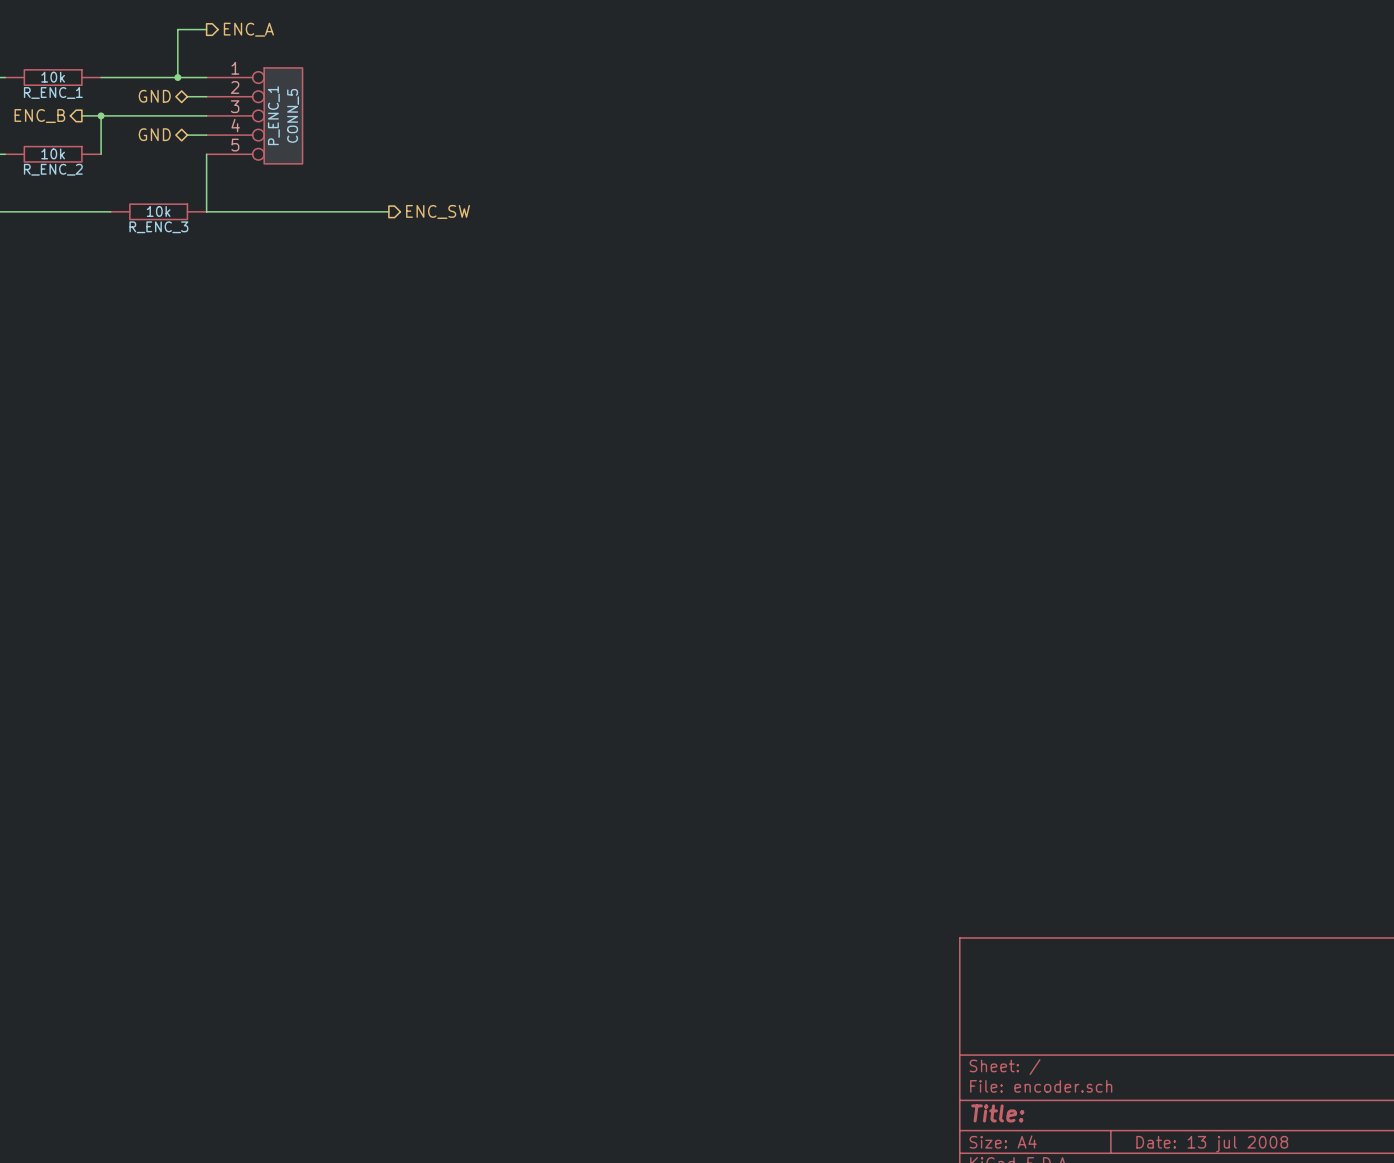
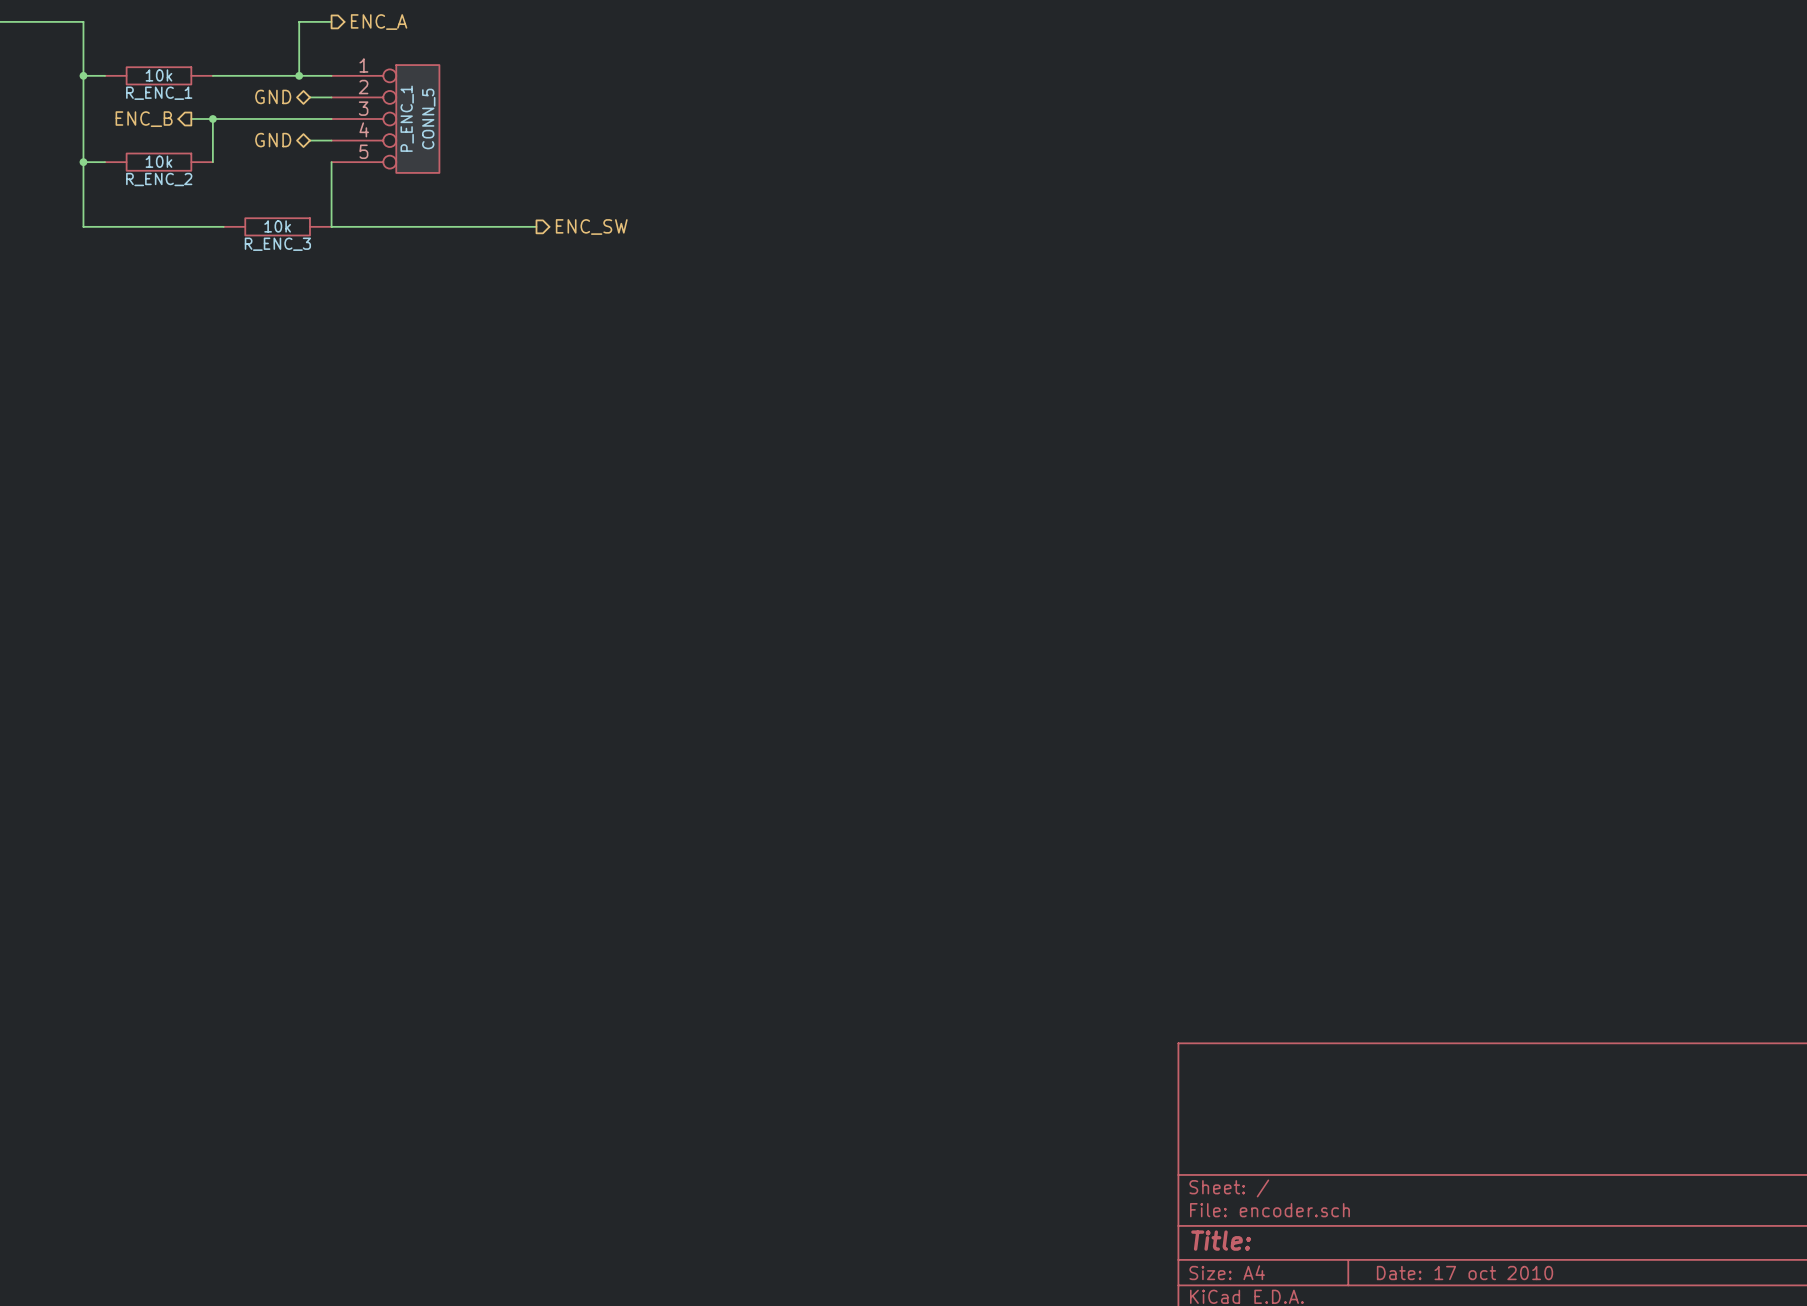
title block: Date: 13 jul 2008 (1212, 1144) -> Date: 17 oct 2010 (1465, 1273)

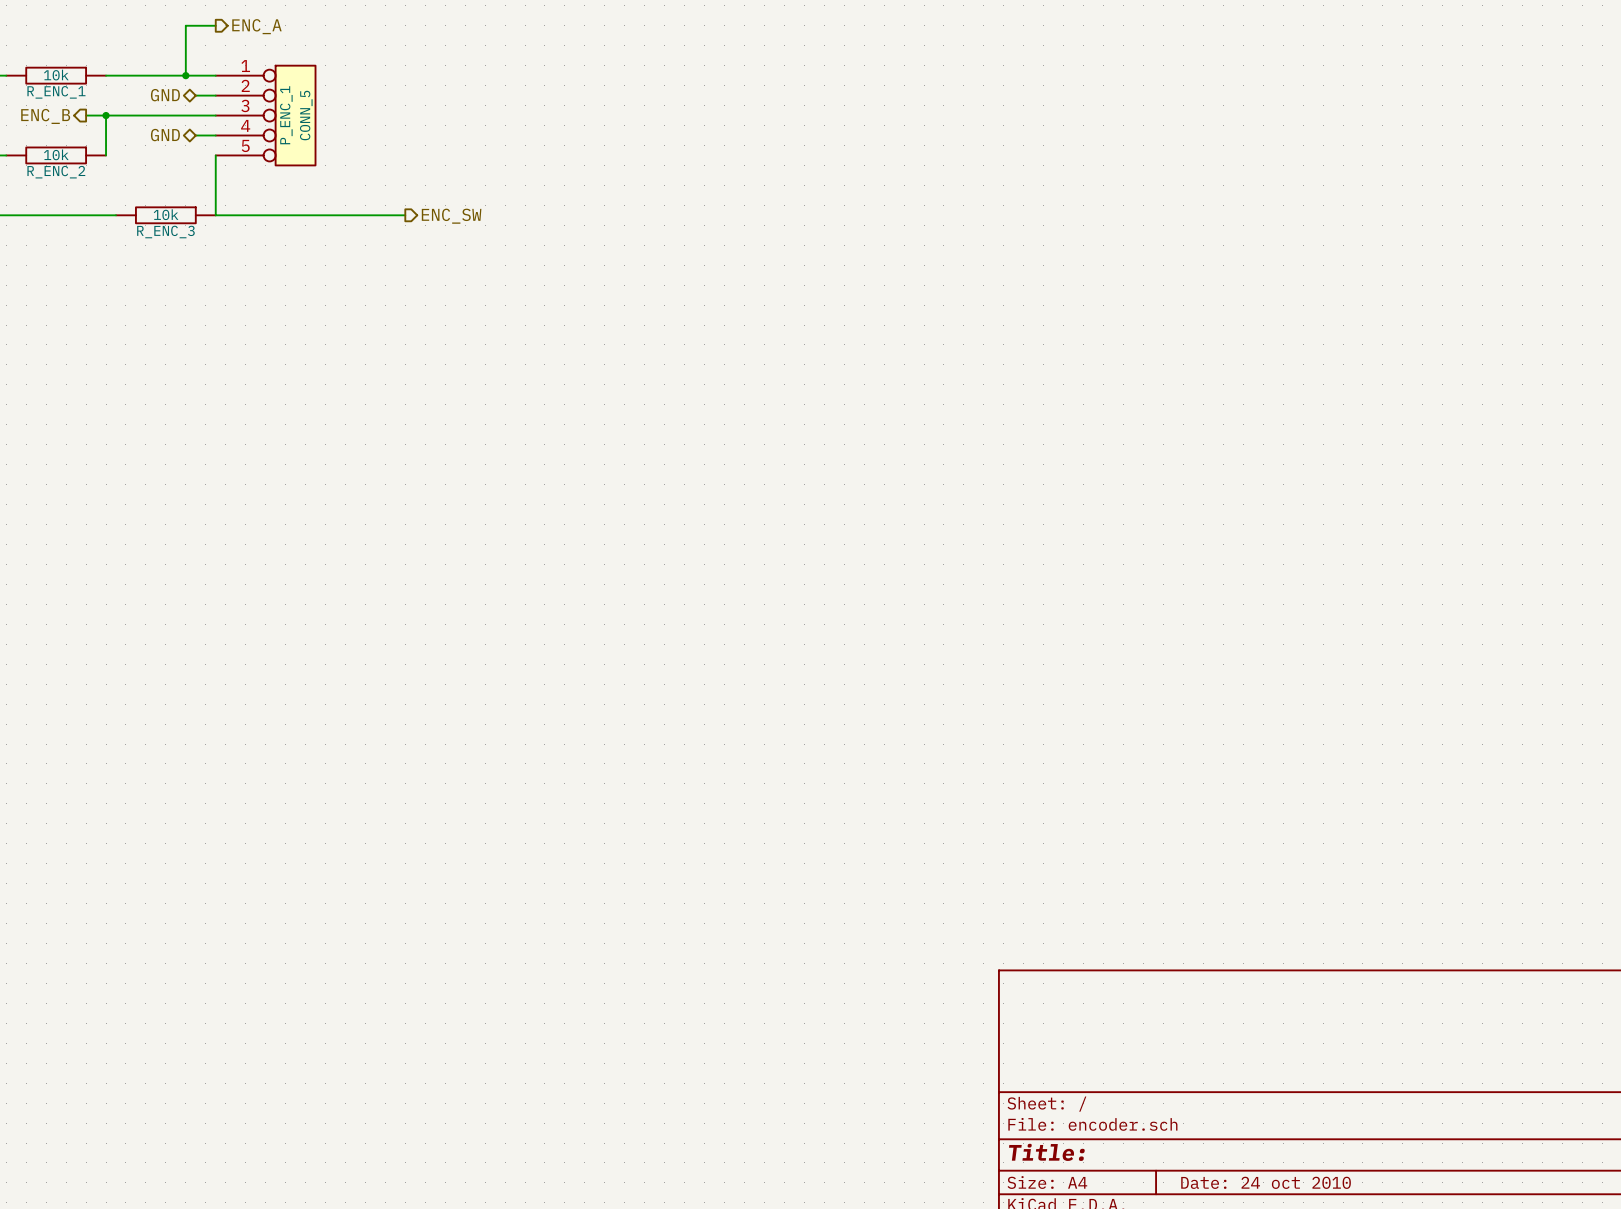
title block: Date: 17 oct 2010 (1465, 1273) -> Date: 24 oct 2010 (1266, 1182)

